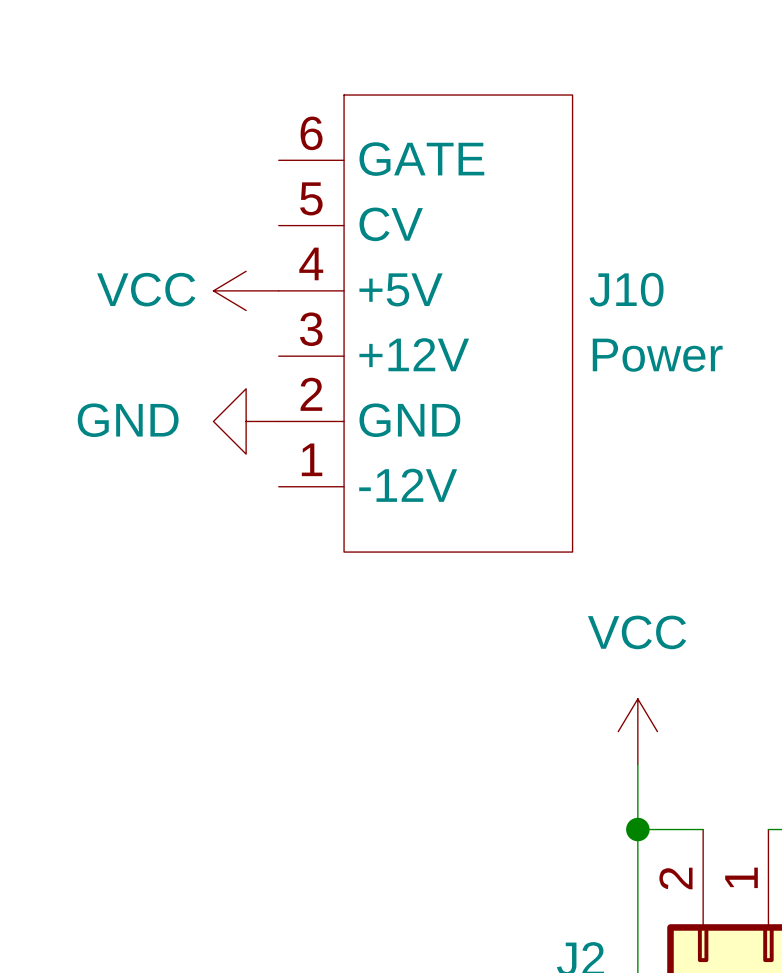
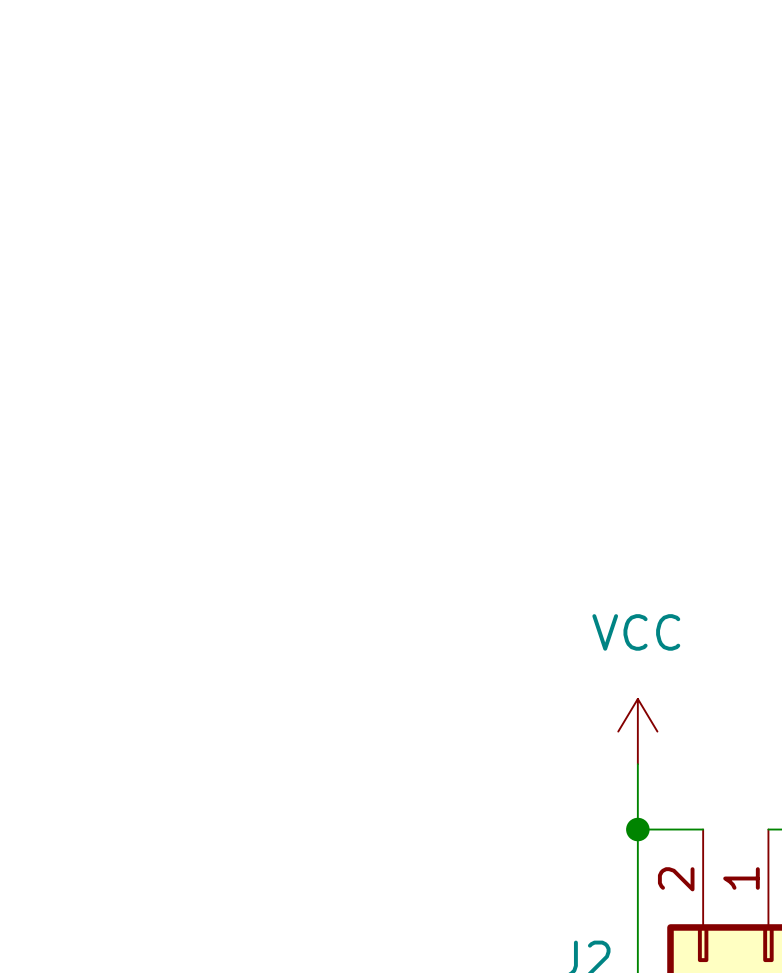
power symbol: VCC (246, 290) -> none
J10: Power (425, 323) -> none
power symbol: GND (246, 421) -> none

